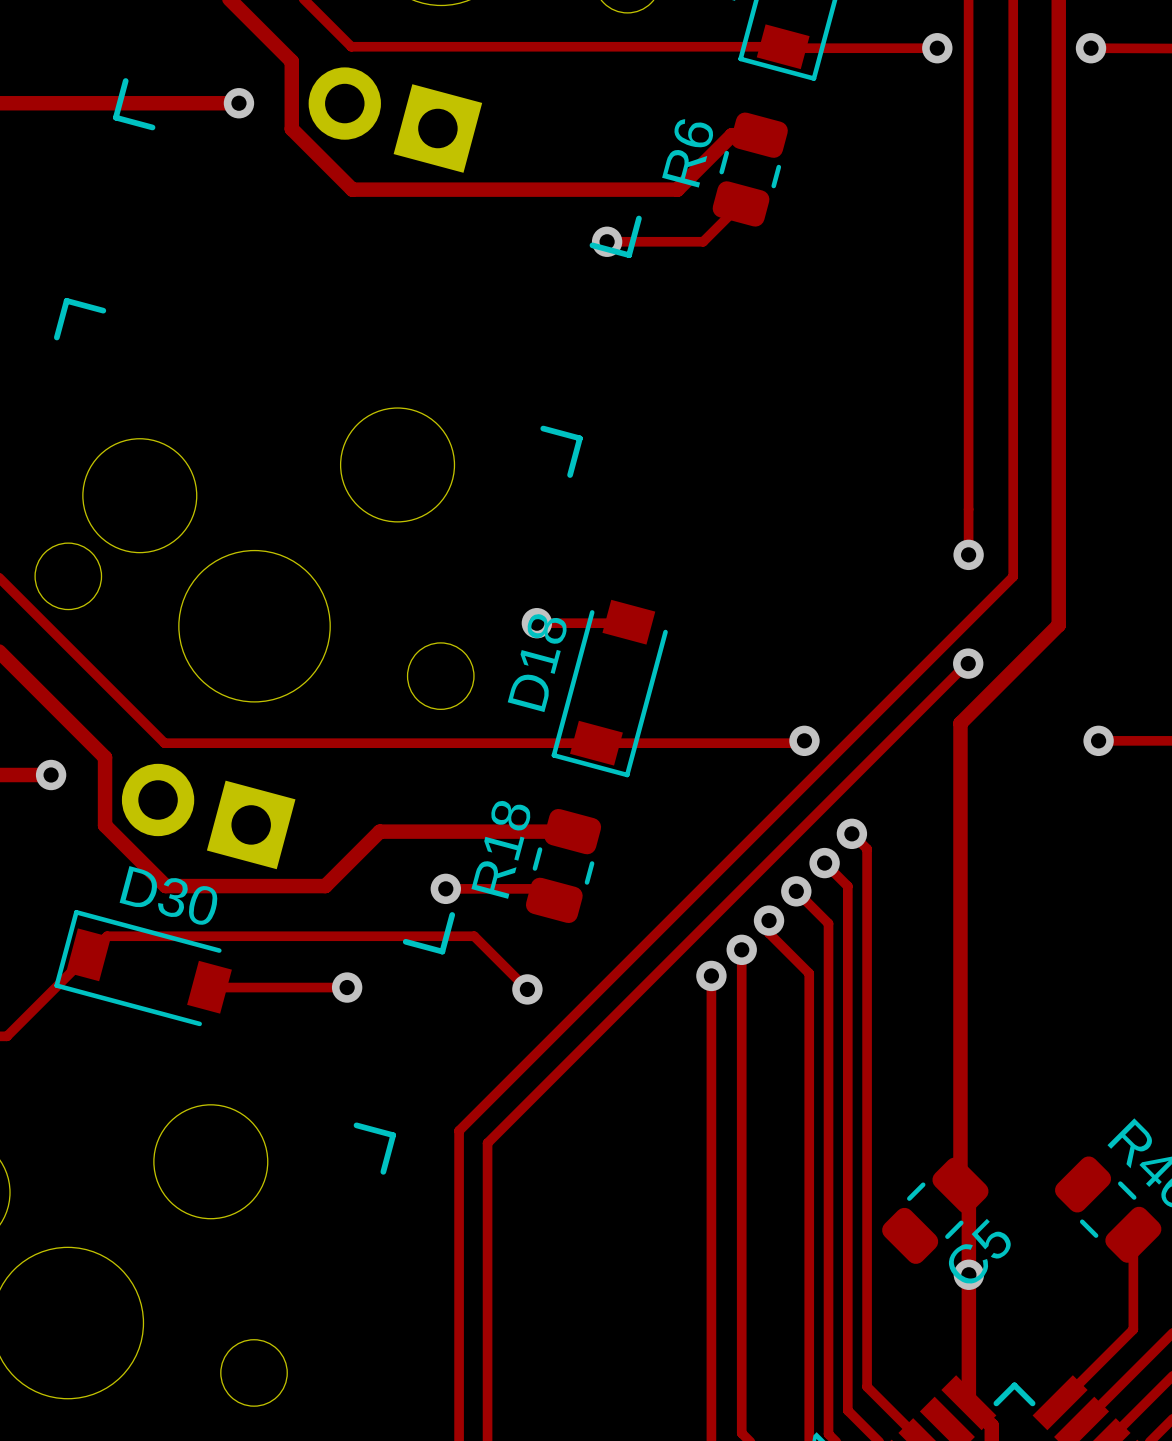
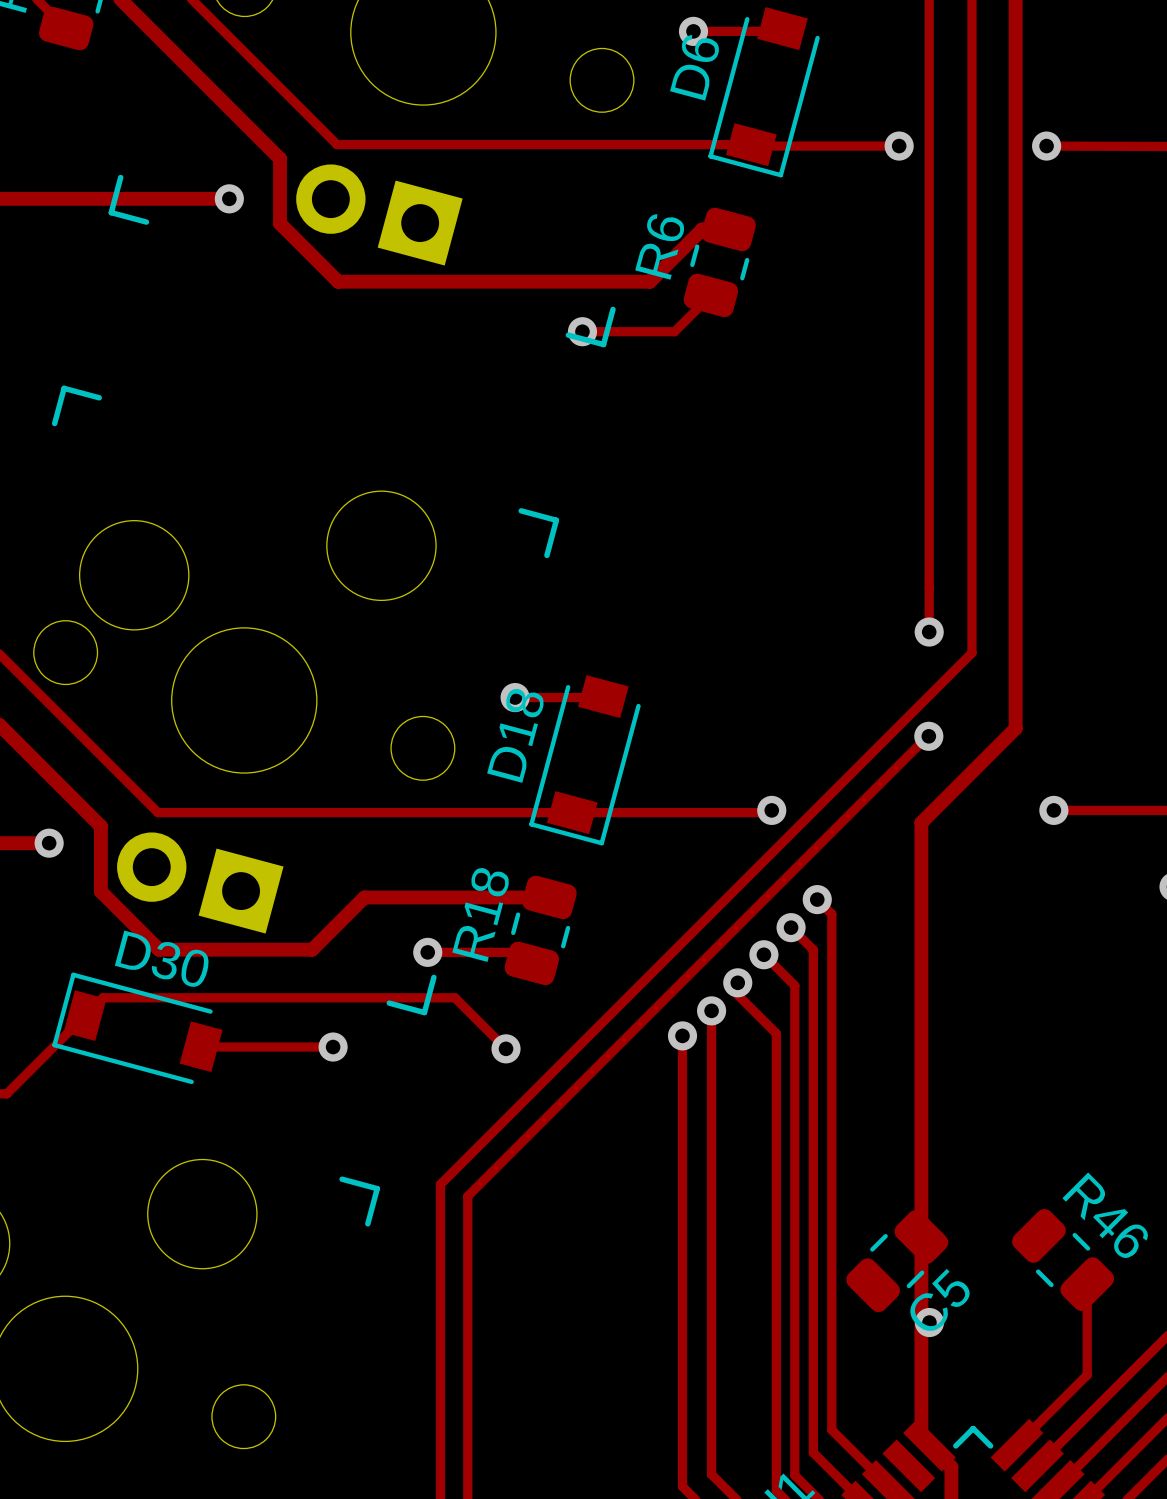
track: (1058, 625) (960, 723) (960, 753) -> (1015, 699) (1015, 728) (921, 822)
track: none -> (921, 1218) (921, 1437)
track: (960, 1185) (968, 1193) (968, 1402) -> none

